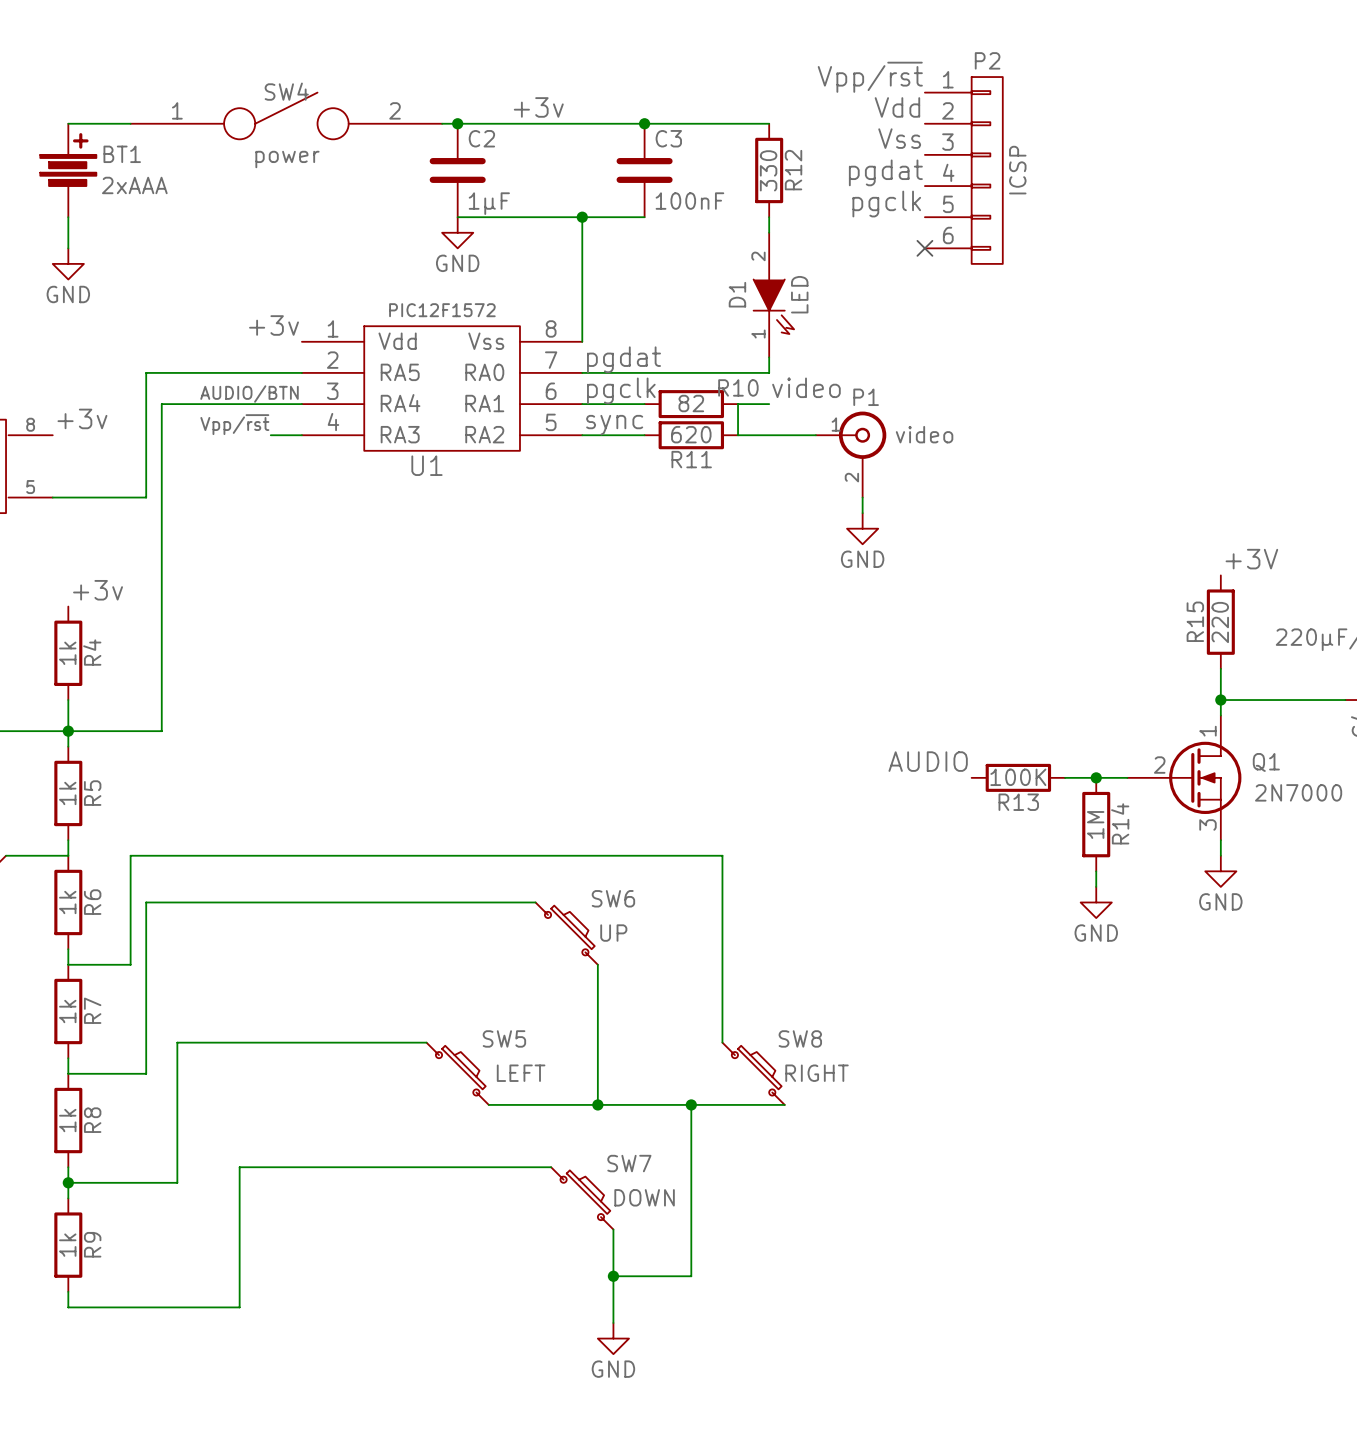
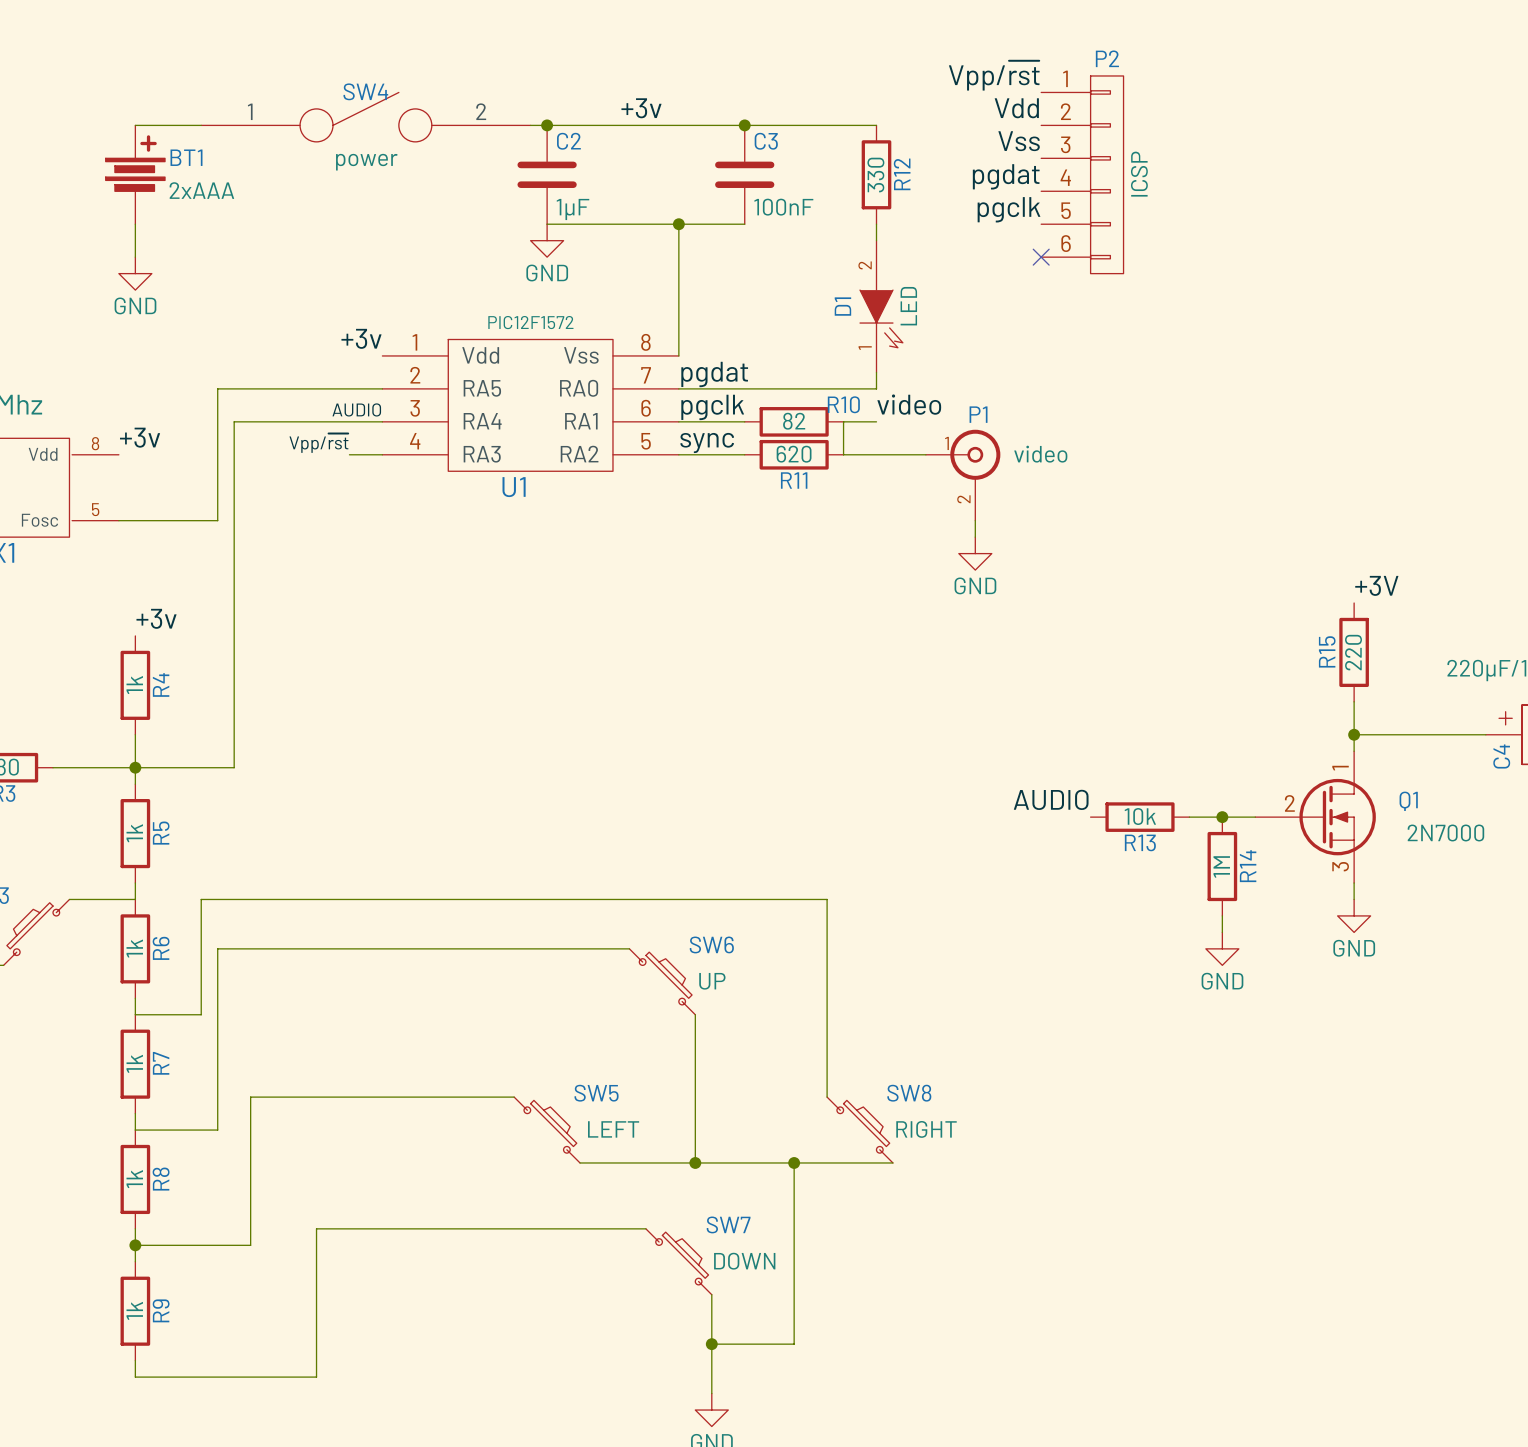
label: AUDIO/BTN (249, 394) -> AUDIO (356, 409)
R13 value: 100K (1018, 777) -> 10k (1140, 816)

